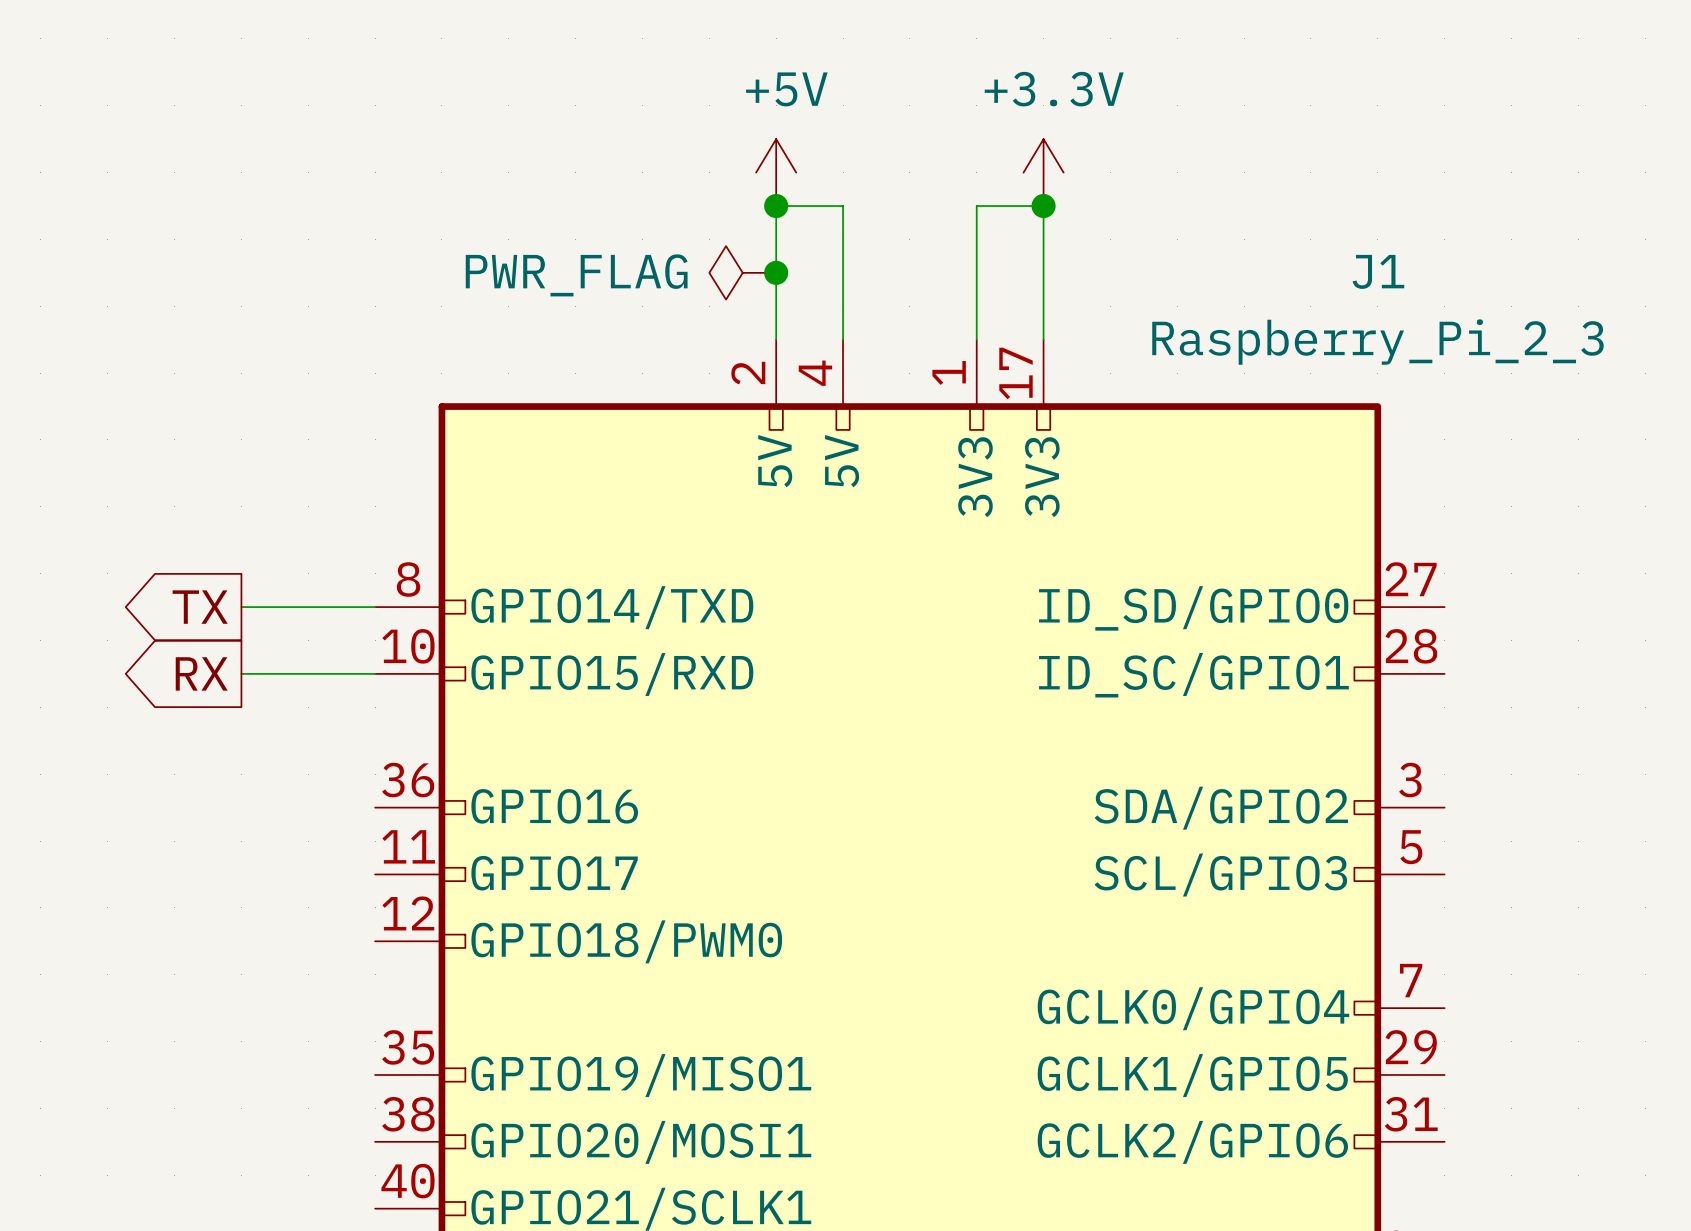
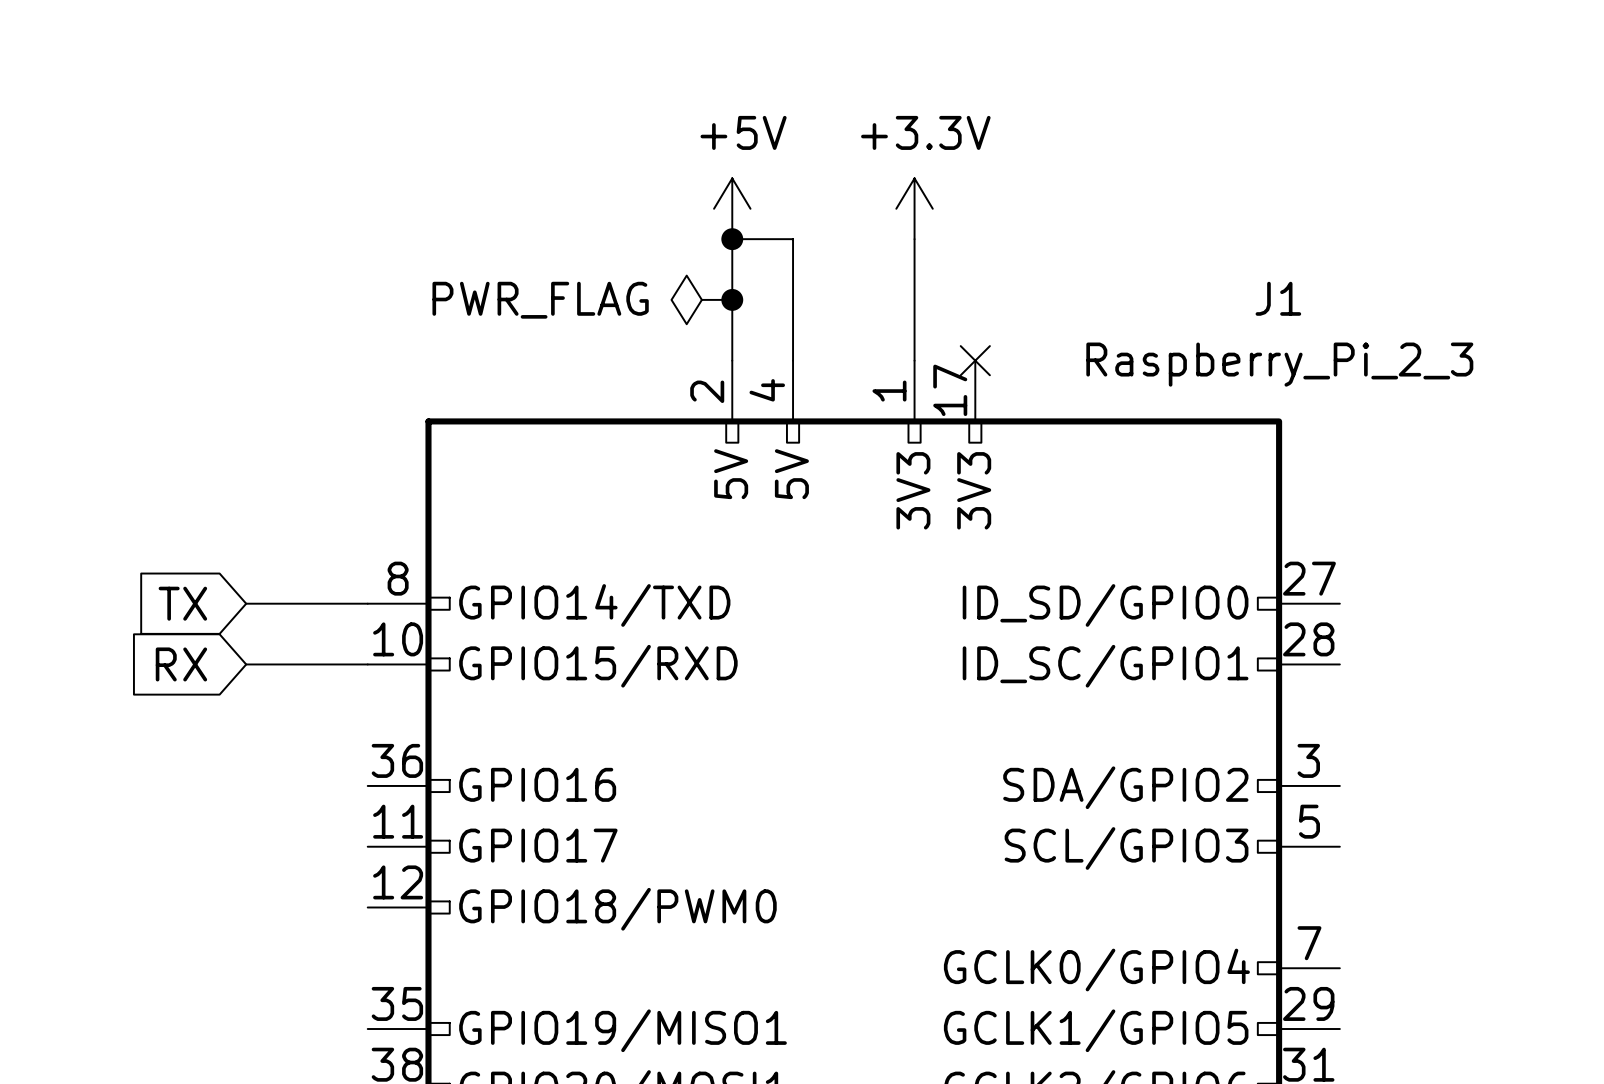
power symbol position: +3.3V (1043, 172) -> +3.3V (914, 208)
wire: (976, 206) (1043, 206) (1043, 339) -> none
junction: (1043, 206) -> none
no-connect mark: none -> (975, 360)
global label shape: output (200, 607) -> input (182, 603)
global label shape: output (201, 673) -> input (181, 664)

